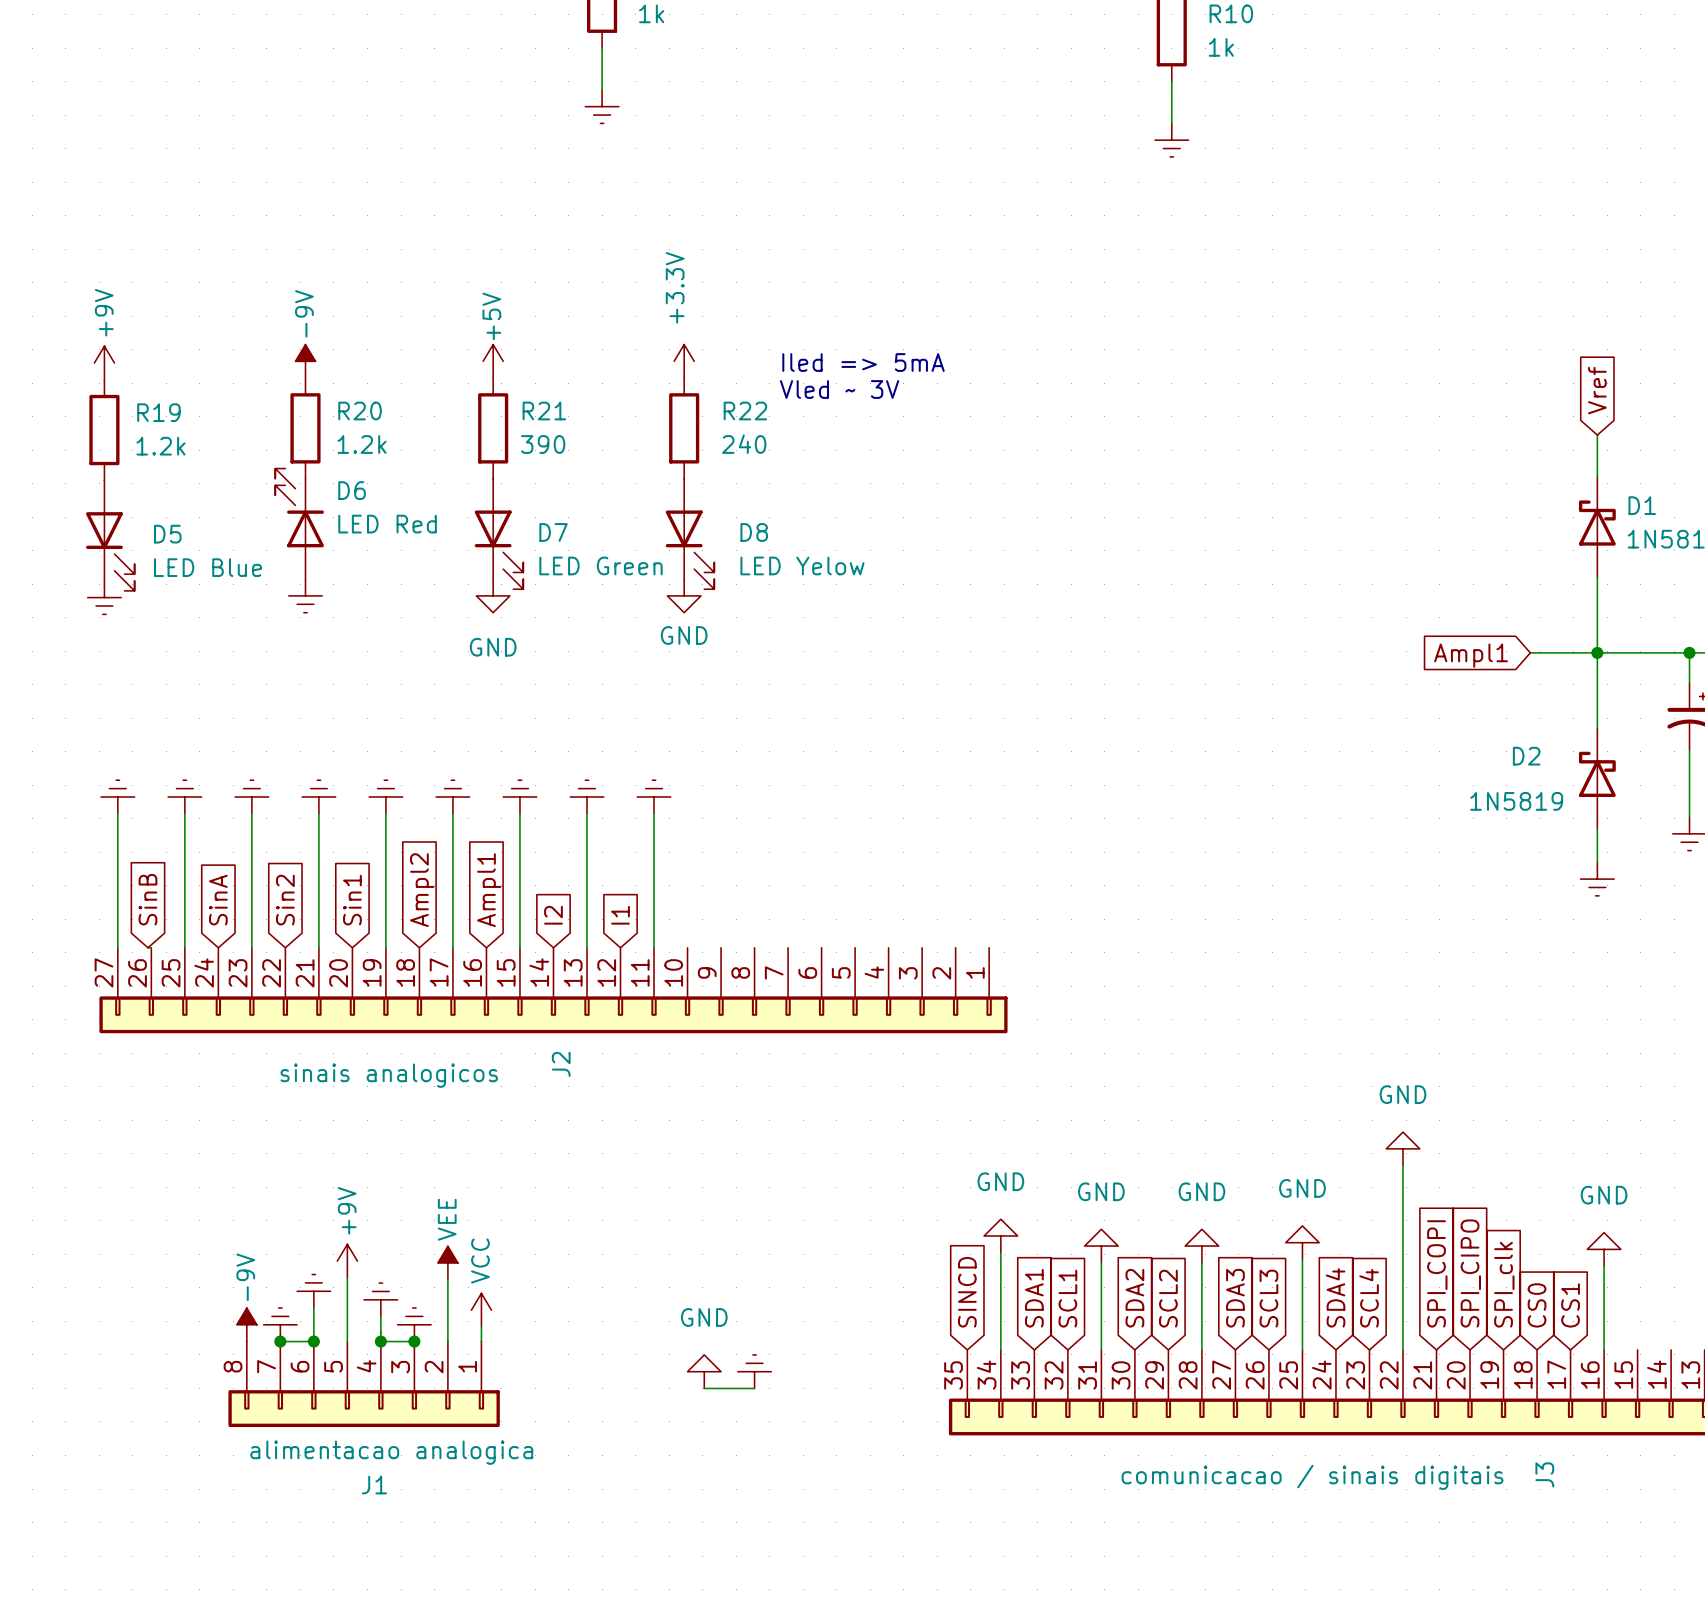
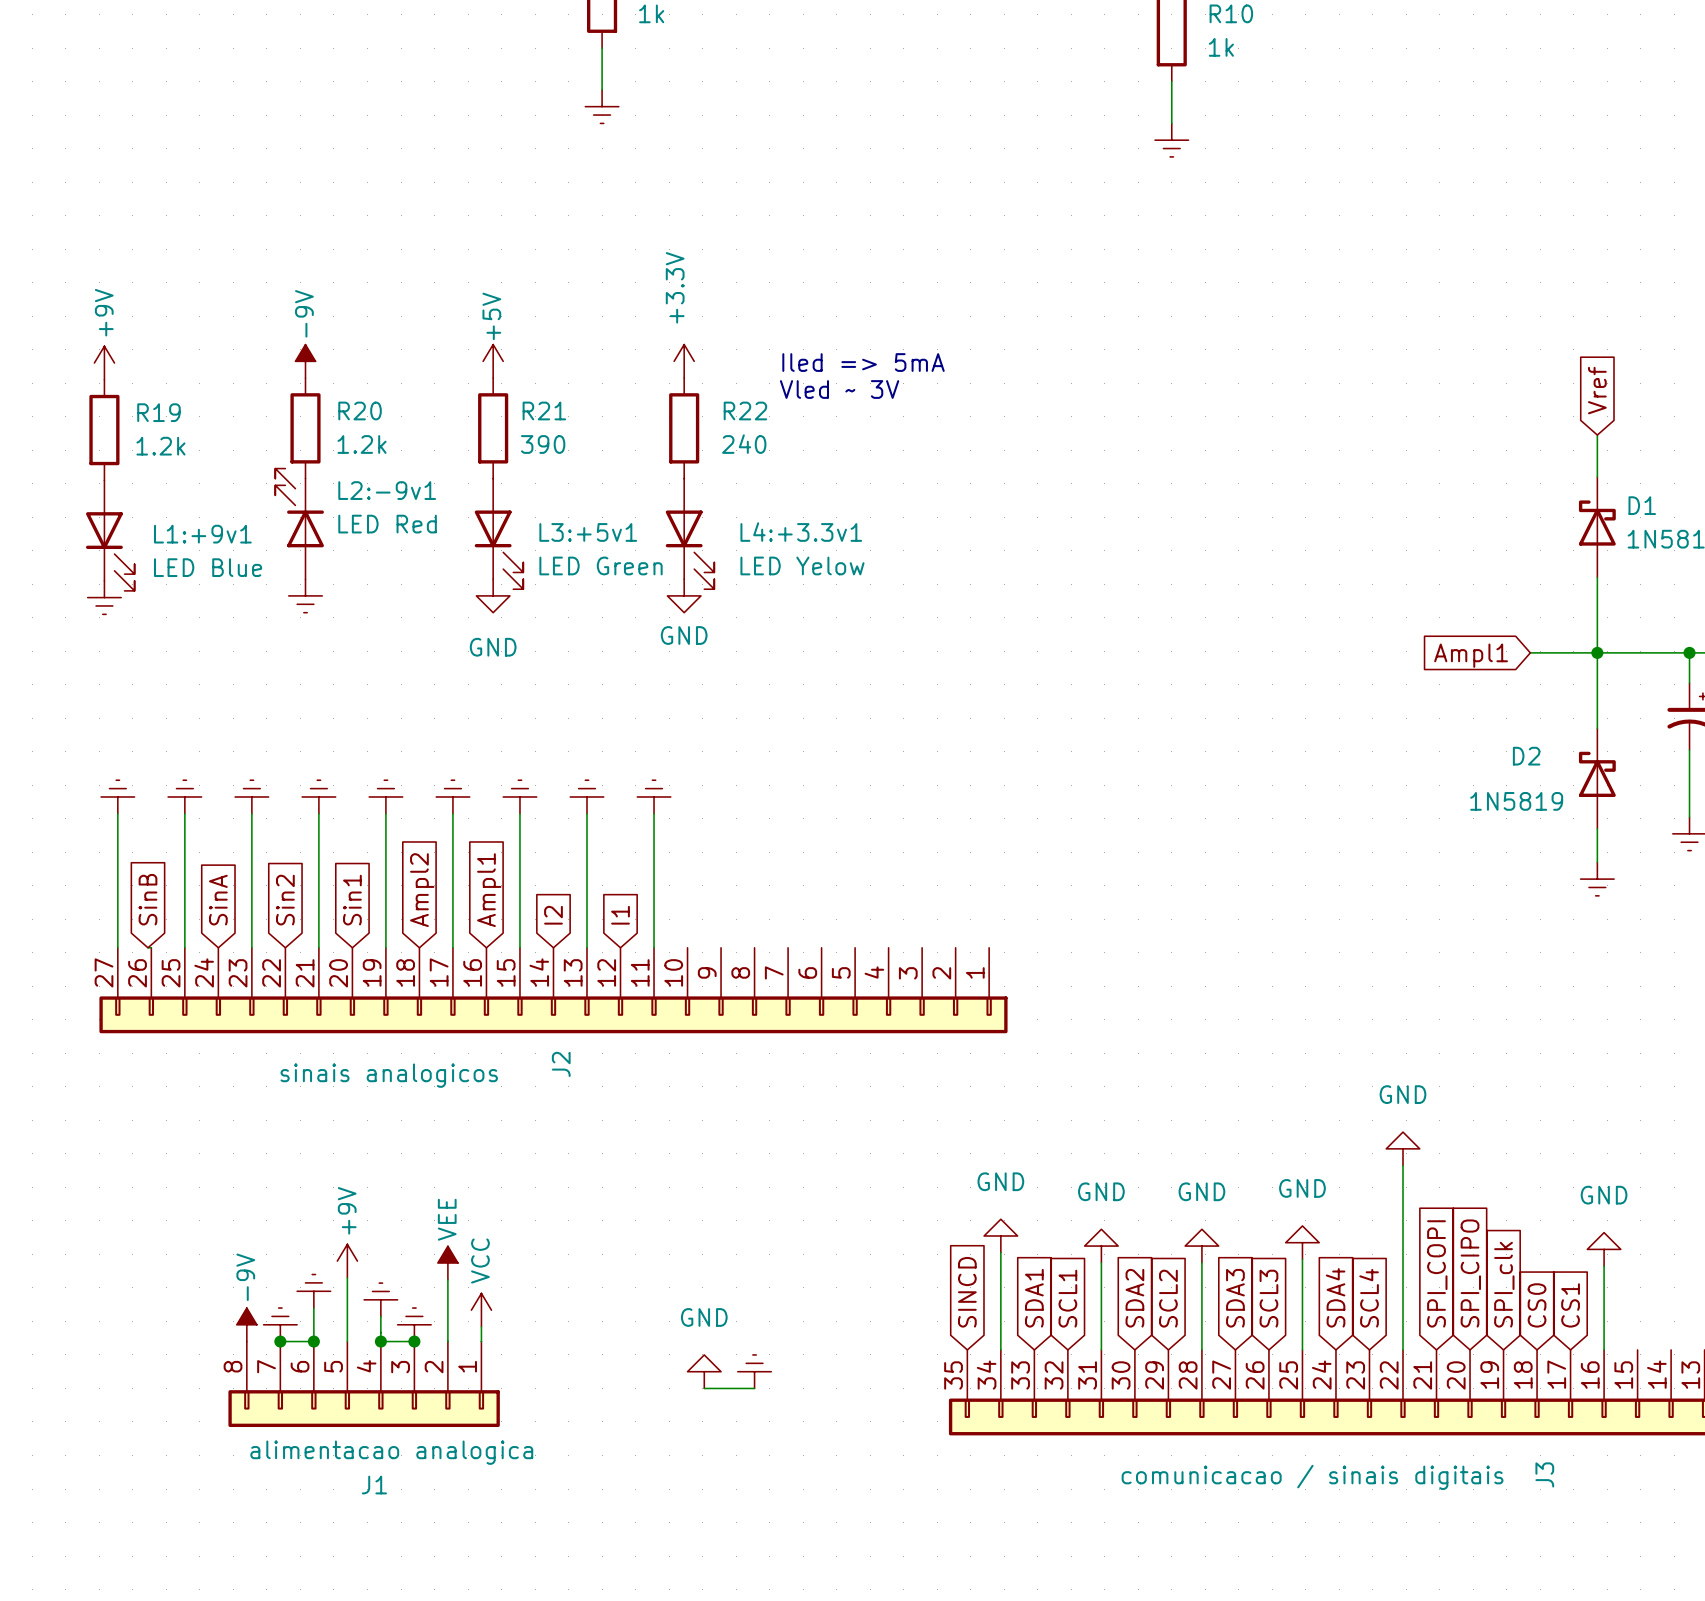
D6 name: D6 (352, 490) -> L2:-9v1 (387, 490)
D7 name: D7 (553, 532) -> L3:+5v1 (588, 532)
D8 name: D8 (754, 532) -> L4:+3.3v1 (801, 532)
D5 name: D5 (167, 534) -> L1:+9v1 (202, 534)

